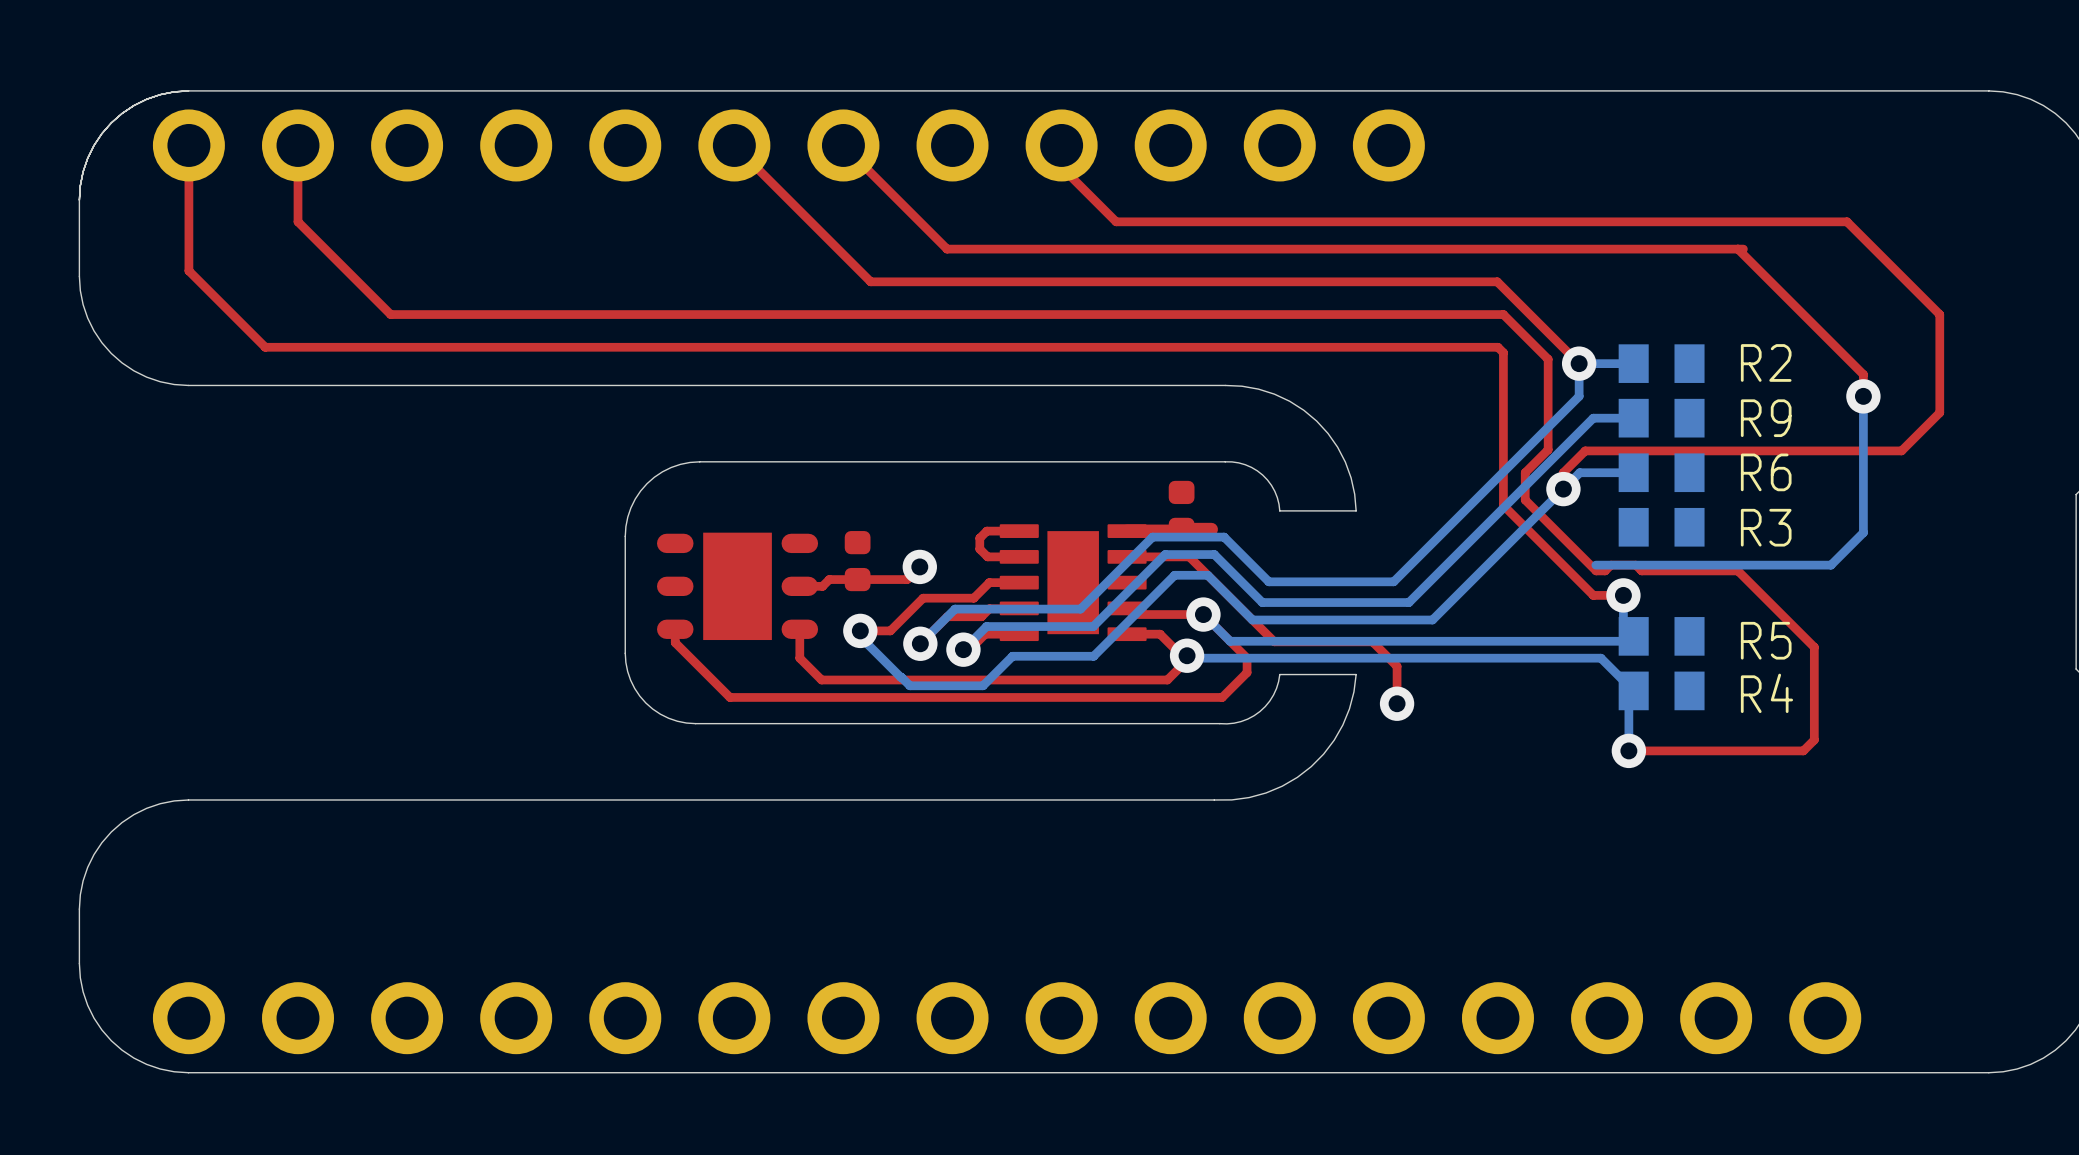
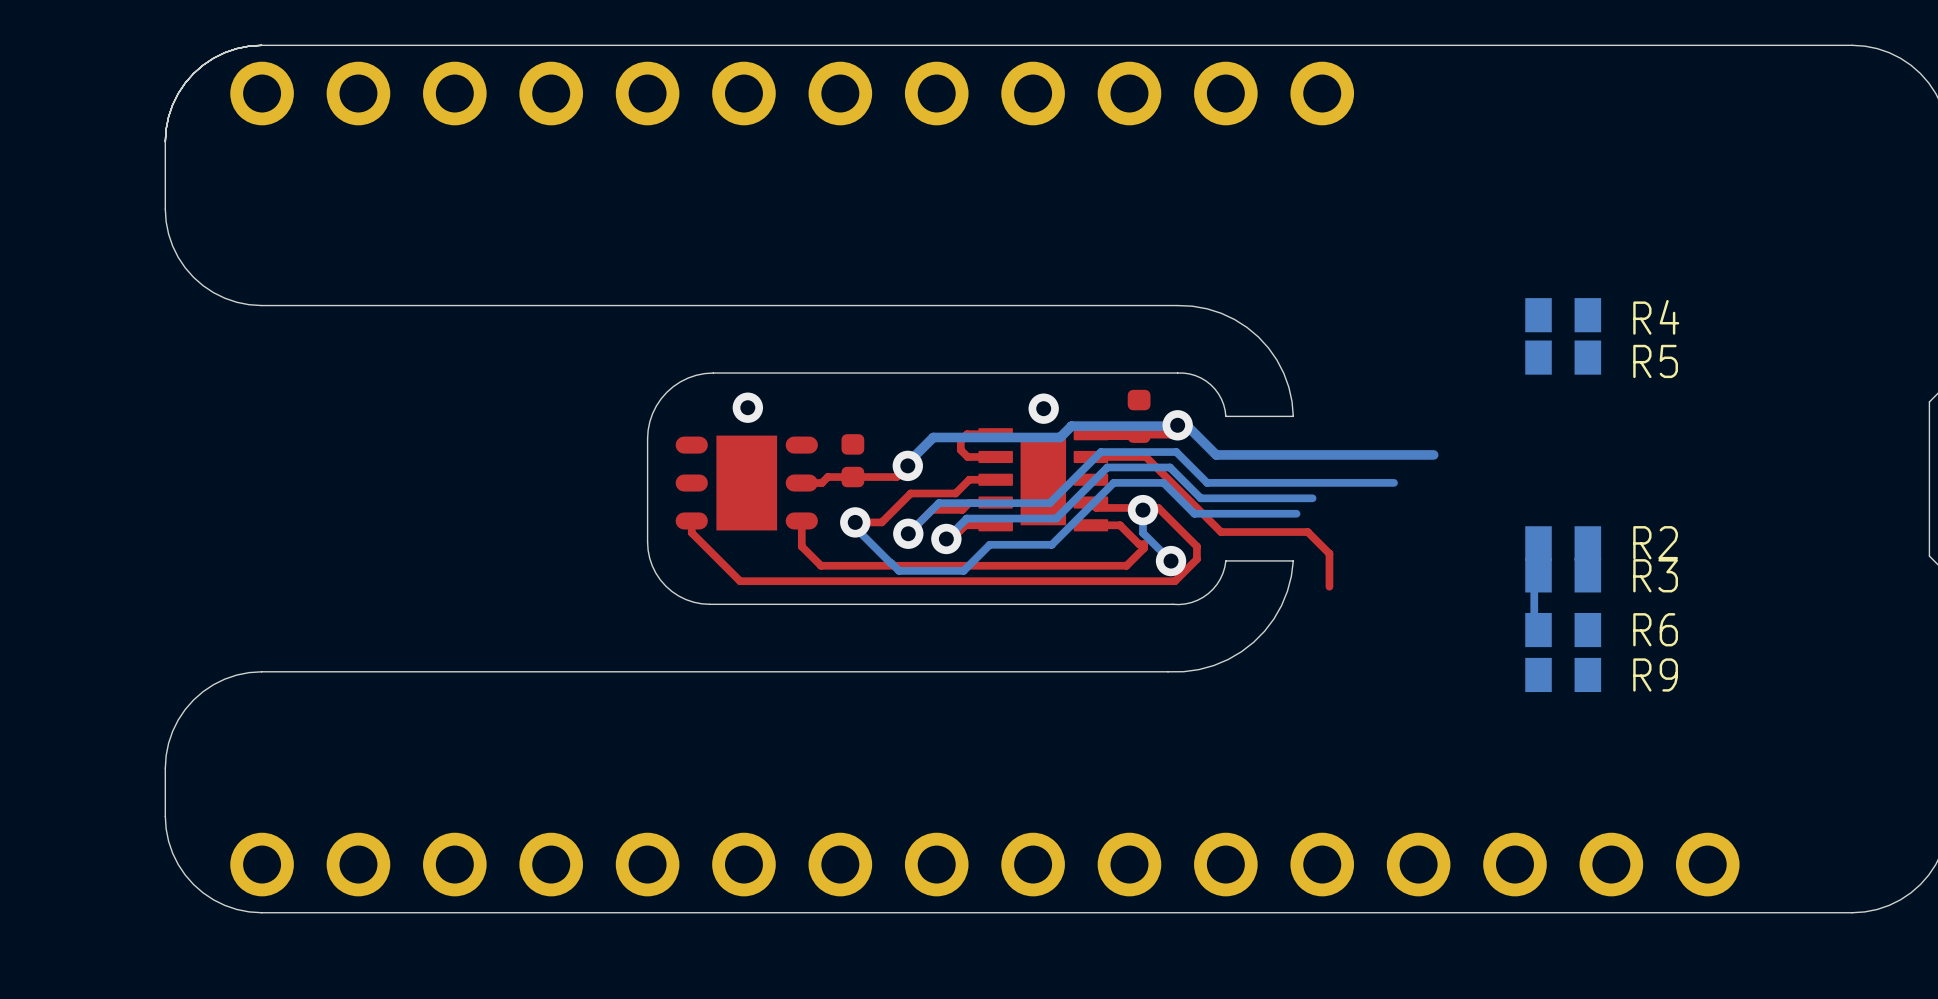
top track: (188, 145) (188, 270) (265, 347) (1497, 347) (1503, 352) (1503, 505) (1593, 595) (1623, 595) -> none
top track: (298, 145) (298, 221) (390, 314) (1503, 314) (1548, 359) (1548, 449) (1525, 472) (1525, 500) (1596, 570) (1605, 570) (1610, 565) (1635, 565) (1641, 570) (1737, 570) (1814, 647) (1814, 740) (1803, 750) (1628, 750) -> none
top track: (734, 145) (870, 281) (1497, 281) (1579, 363) -> none
top track: (843, 145) (947, 249) (1743, 249) -> none
top track: (1061, 145) (1061, 167) (1116, 221) (1847, 221) (1939, 314) (1939, 412) (1901, 450) (1585, 450) (1563, 472) (1563, 489) -> none
top track: (1737, 249) (1863, 374) (1863, 396) -> none
via: (1579, 363) -> none
bottom track: (1633, 363) (1579, 363) (1579, 396) (1393, 581) (1268, 581) (1224, 537) (1152, 537) (1138, 551) -> (1394, 482) (1207, 482) (1176, 452) (1100, 452)
R2 position: (1661, 363) -> (1563, 543)
R4: none -> (1563, 315)
bottom track: (1863, 396) (1863, 532) (1831, 565) (1595, 565) -> none
via: (1863, 396) -> none
bottom track: (1633, 418) (1593, 418) (1408, 602) (1262, 602) (1214, 554) (1165, 554) (1093, 626) (1087, 626) -> (1312, 498) (1200, 498) (1169, 467) (1107, 467) (1056, 518)
R9 position: (1661, 418) -> (1563, 674)
bottom track: (1633, 472) (1579, 472) (1432, 620) (1252, 620) (1207, 575) (1174, 575) (1093, 656) (1082, 656) -> (1296, 513) (1194, 513) (1163, 482) (1113, 482) (1051, 544)
R6 position: (1661, 472) -> (1563, 630)
via: (1563, 489) -> none
via: none -> (747, 407)
via: none -> (1043, 408)
via: none -> (1177, 425)
R3: (1661, 527) -> none
bottom track: none -> (1433, 454) (1216, 454) (1187, 426) (1071, 426) (1060, 437) (933, 437) (907, 462) (907, 465)
bottom track: (1623, 595) (1623, 626) (1638, 641) (1230, 641) (1203, 614) -> none
via: (1623, 595) -> none
via position: (1203, 614) -> (1142, 510)
bottom track: none -> (1142, 510) (1142, 533) (1171, 561)
R5 position: (1661, 636) -> (1563, 357)
bottom track: (1187, 655) (1189, 658) (1600, 658) (1633, 690) -> none
via position: (1187, 655) -> (1171, 561)
R4 name: R4 (1766, 693) -> R3 (1655, 575)
via: (1397, 703) -> none
via: (1628, 750) -> none

